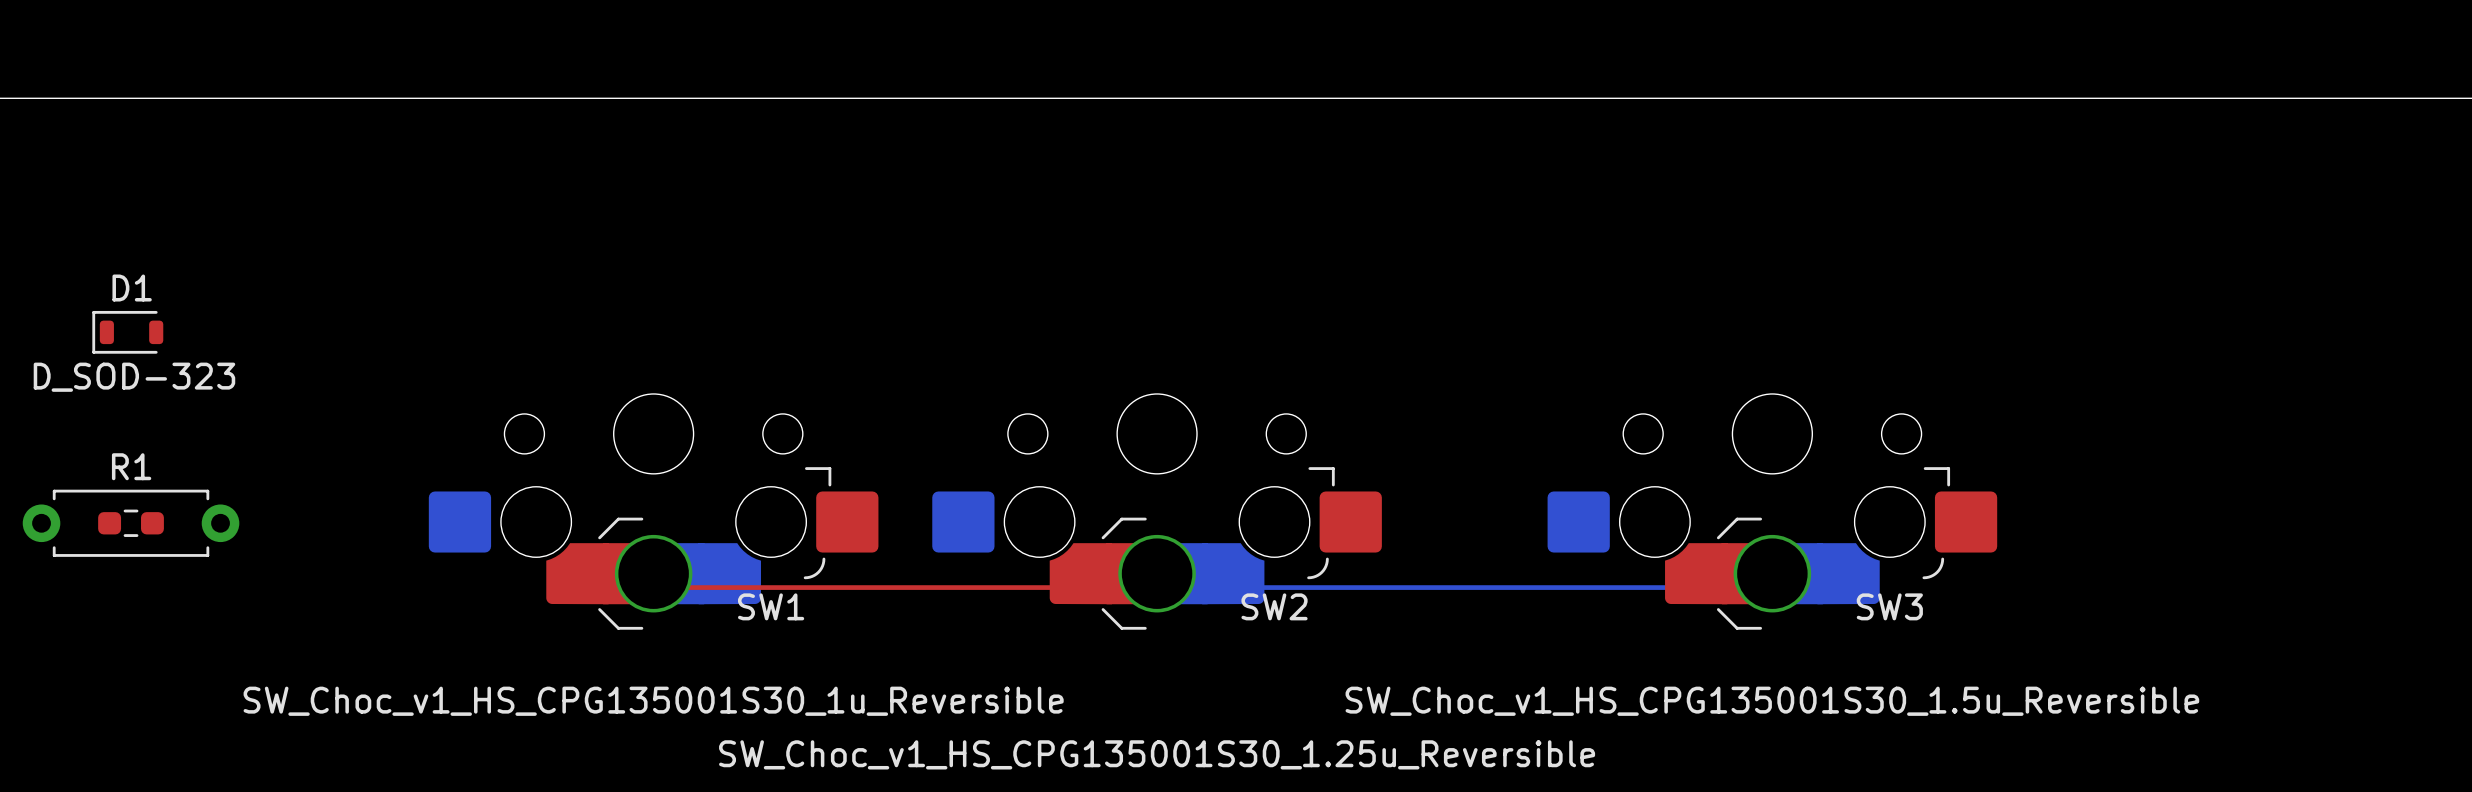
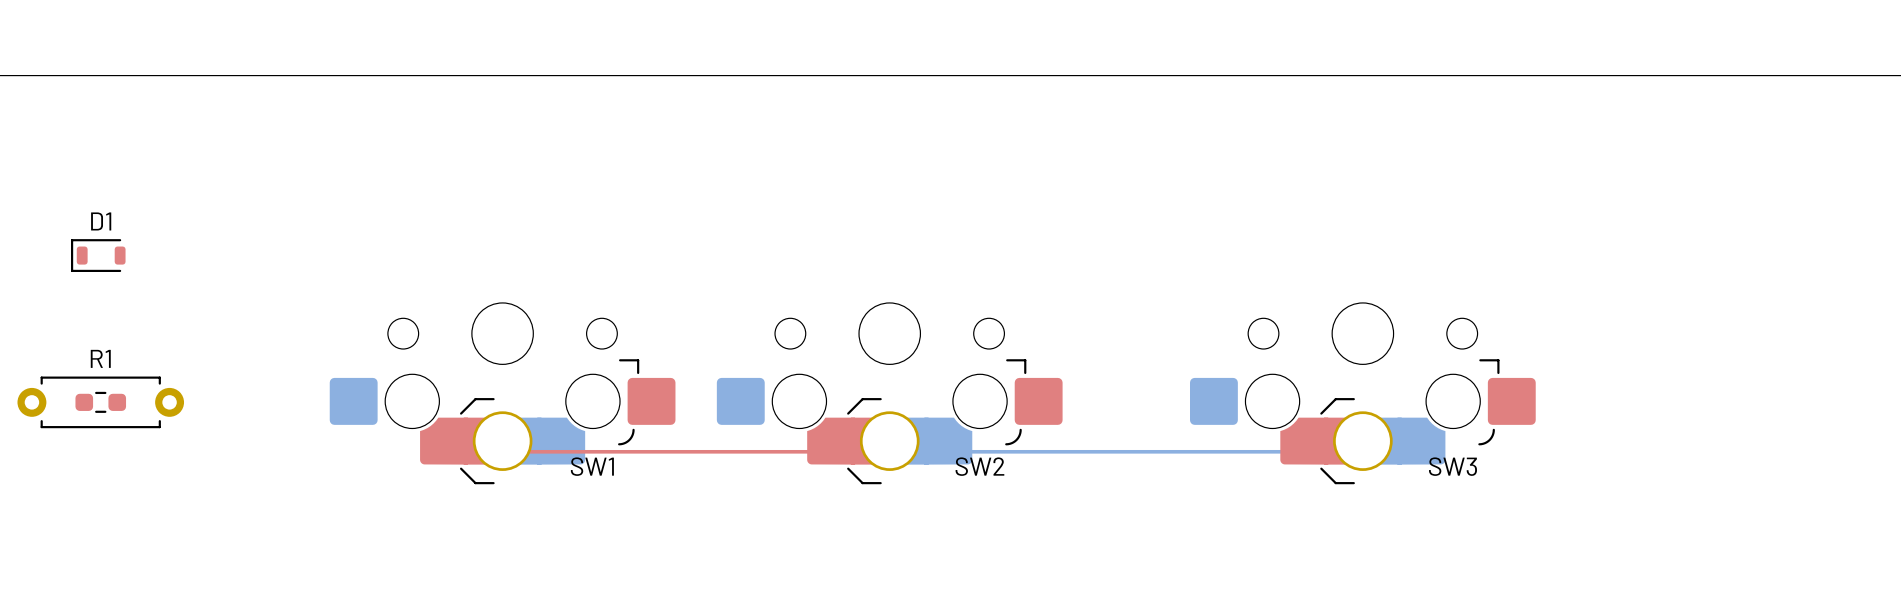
D1 value: D_SOD-323 (134, 377) -> none
SW1 value: SW_Choc_v1_HS_CPG135001S30_1u_Reversible (653, 701) -> none
SW3 value: SW_Choc_v1_HS_CPG135001S30_1.5u_Reversible (1772, 701) -> none
SW2 value: SW_Choc_v1_HS_CPG135001S30_1.25u_Reversible (1157, 754) -> none

